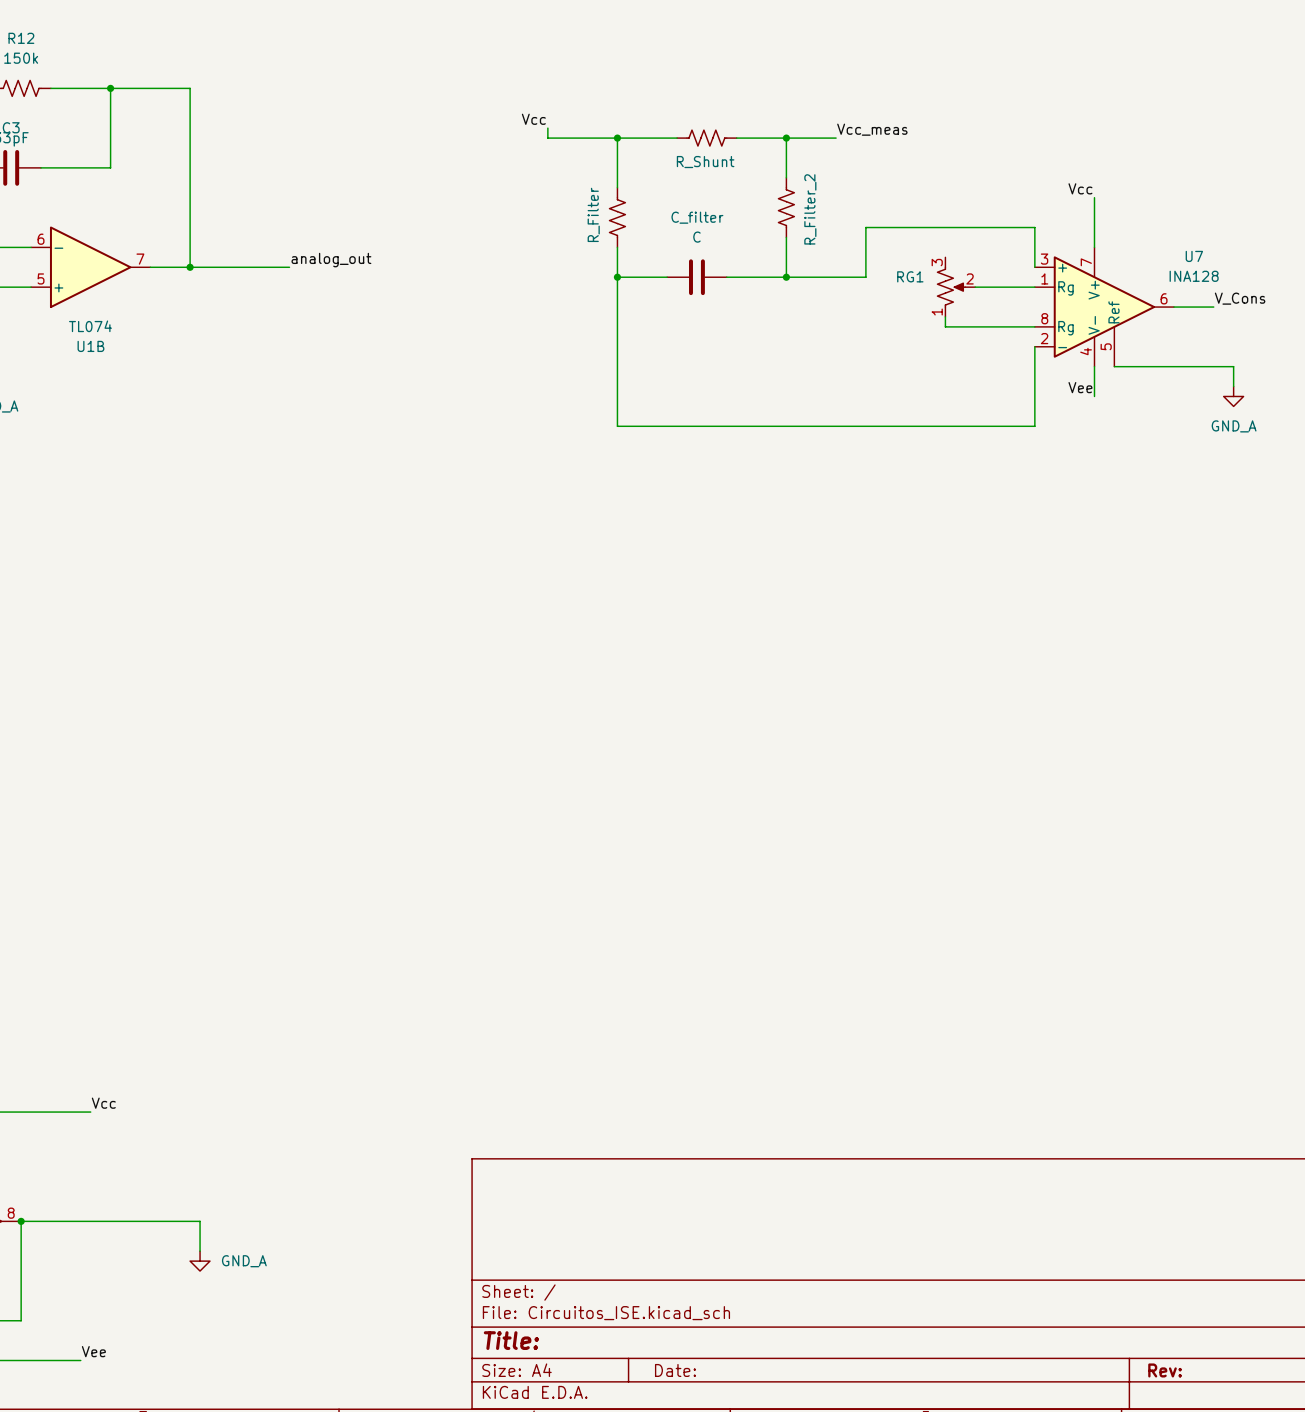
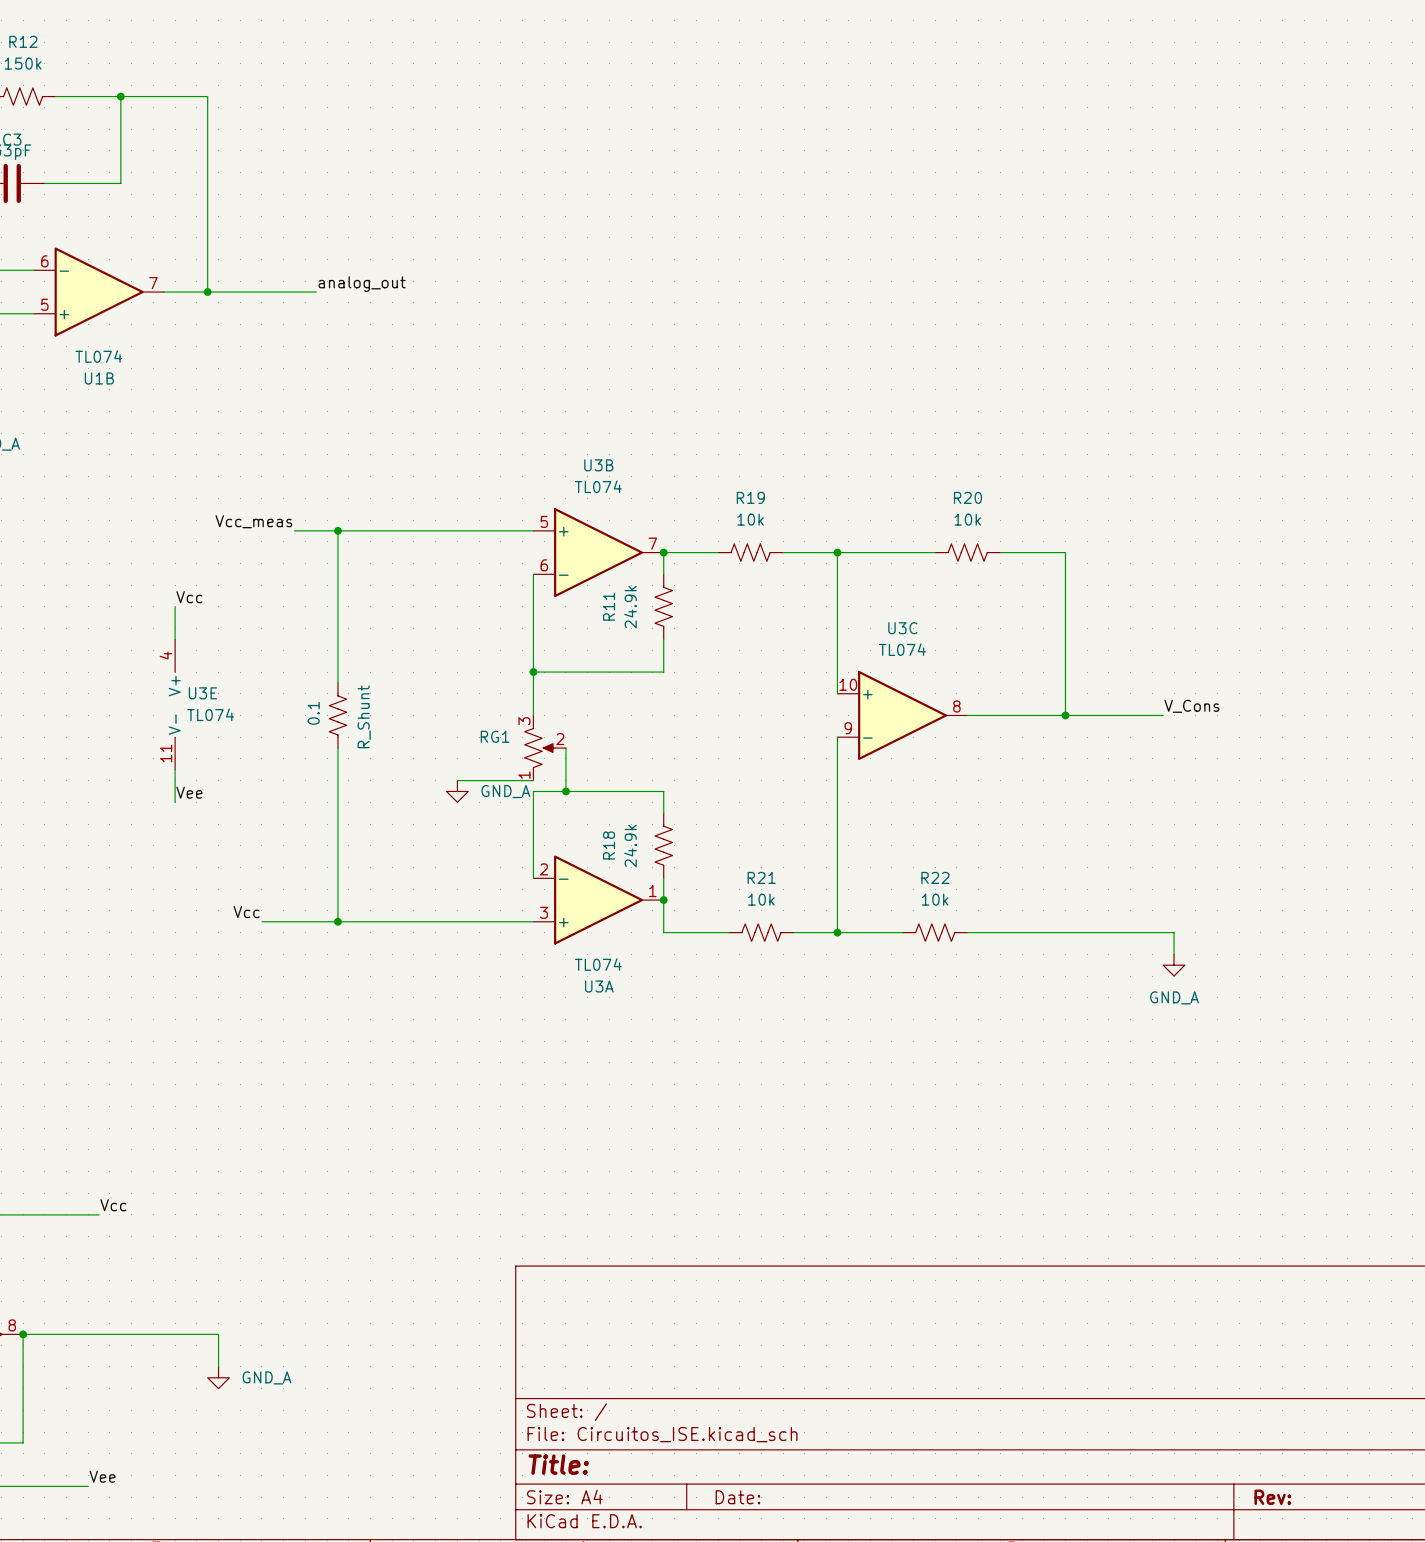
label: Vcc (533, 119) -> none
wire: (547, 128) (547, 138) (677, 138) -> none
label: Vcc_meas (872, 129) -> none
wire: (617, 138) (617, 187) -> none
junction: (617, 138) -> none
R_Shunt: (706, 138) -> none
wire: (736, 138) (836, 138) -> none
wire: (786, 138) (786, 177) -> none
junction: (786, 138) -> none
label: Vcc (1080, 188) -> none
wire: (1094, 197) (1094, 247) -> none
R_Filter_2: (786, 207) -> none
R_Filter: (617, 217) -> none
wire: (786, 237) (786, 277) -> none
wire: (617, 247) (617, 426) (1034, 426) (1034, 346) -> none
wire: (1034, 267) (1034, 227) (865, 227) (865, 277) (726, 277) -> none
wire: (617, 277) (667, 277) -> none
junction: (617, 277) -> none
C_filter: C (696, 277) -> none
junction: (786, 277) -> none
RG1 position: (956, 287) -> (545, 748)
wire: (975, 287) (1034, 287) -> none
label: V_Cons (1240, 298) -> none
U7: INA128 (1104, 307) -> none
wire: (1173, 307) (1213, 307) -> none
wire: (945, 316) (945, 326) (1034, 326) -> none
wire: (1094, 366) (1094, 396) -> none
wire: (1114, 366) (1233, 366) (1233, 386) -> none
label: Vee (1080, 387) -> none
power symbol: GND_A (1233, 396) -> none
label: none -> Vcc_meas (253, 521)
wire: none -> (294, 530) (533, 530)
wire: none -> (337, 530) (337, 682)
junction: none -> (337, 530)
U3B: none -> TL074 (598, 552)
junction: none -> (663, 552)
wire: none -> (718, 552) (663, 552) (663, 574)
R19: none -> 10k (750, 552)
wire: none -> (783, 552) (935, 552)
wire: none -> (837, 552) (837, 693)
junction: none -> (837, 552)
R20: none -> 10k (967, 552)
wire: none -> (1000, 552) (1065, 552) (1065, 715)
wire: none -> (533, 574) (533, 715)
label: none -> Vcc (189, 597)
wire: none -> (175, 606) (175, 639)
R11: none -> 24.9k (663, 606)
wire: none -> (663, 639) (663, 672) (533, 672)
junction: none -> (533, 672)
U3E: none -> TL074 (175, 704)
label: none -> V_Cons (1191, 706)
R_Shunt: none -> 0.1 (337, 715)
U3C: none -> TL074 (902, 715)
wire: none -> (967, 715) (1163, 715)
junction: none -> (1065, 715)
wire: none -> (837, 737) (837, 932)
wire: none -> (337, 748) (337, 921)
wire: none -> (565, 748) (565, 791)
wire: none -> (175, 769) (175, 802)
wire: none -> (457, 780) (533, 780)
power symbol: none -> GND_A (457, 791)
junction: none -> (565, 791)
label: none -> Vee (189, 792)
wire: none -> (663, 813) (663, 791) (533, 791) (533, 878)
R18: none -> 24.9k (663, 845)
wire: none -> (663, 878) (663, 932) (728, 932)
U3A: none -> TL074 (598, 900)
junction: none -> (663, 900)
label: none -> Vcc (246, 912)
wire: none -> (261, 921) (533, 921)
junction: none -> (337, 921)
R21: none -> 10k (761, 932)
wire: none -> (794, 932) (902, 932)
junction: none -> (837, 932)
R22: none -> 10k (935, 932)
wire: none -> (967, 932) (1174, 932) (1174, 954)
power symbol: none -> GND_A (1174, 965)

